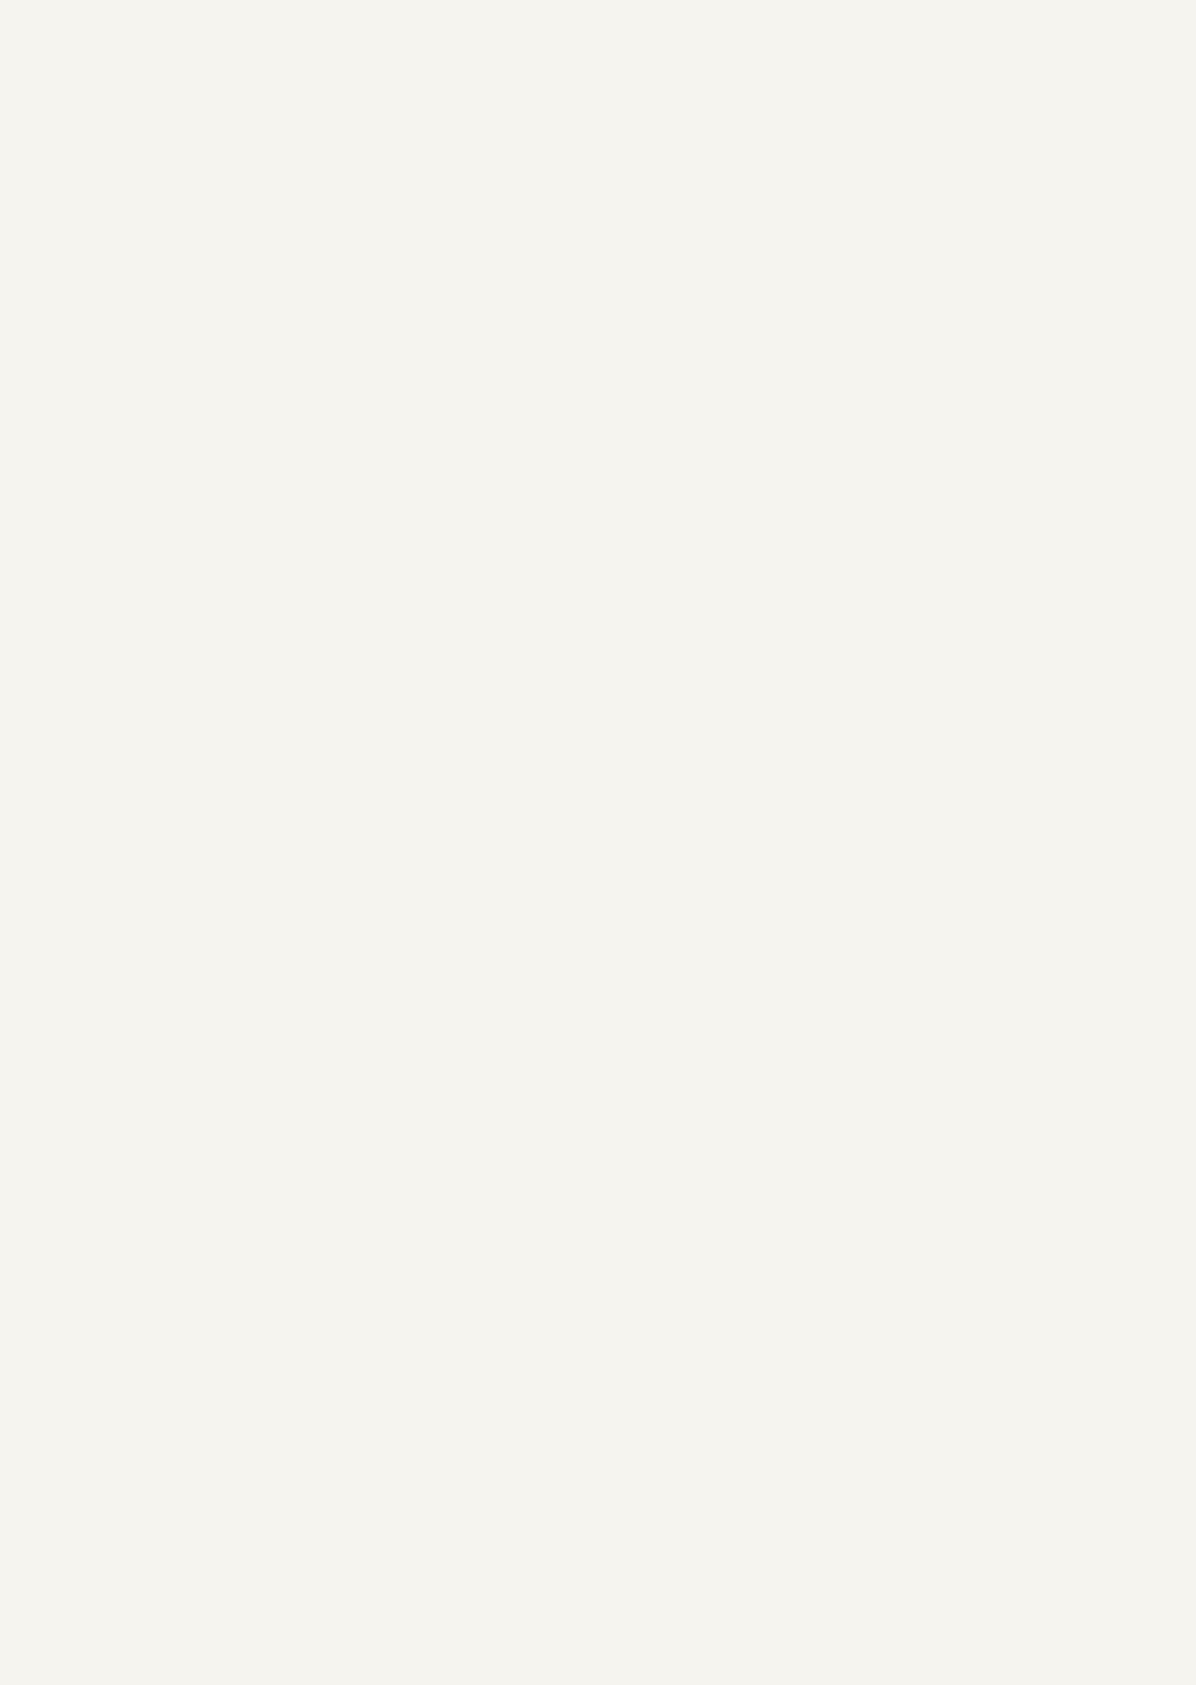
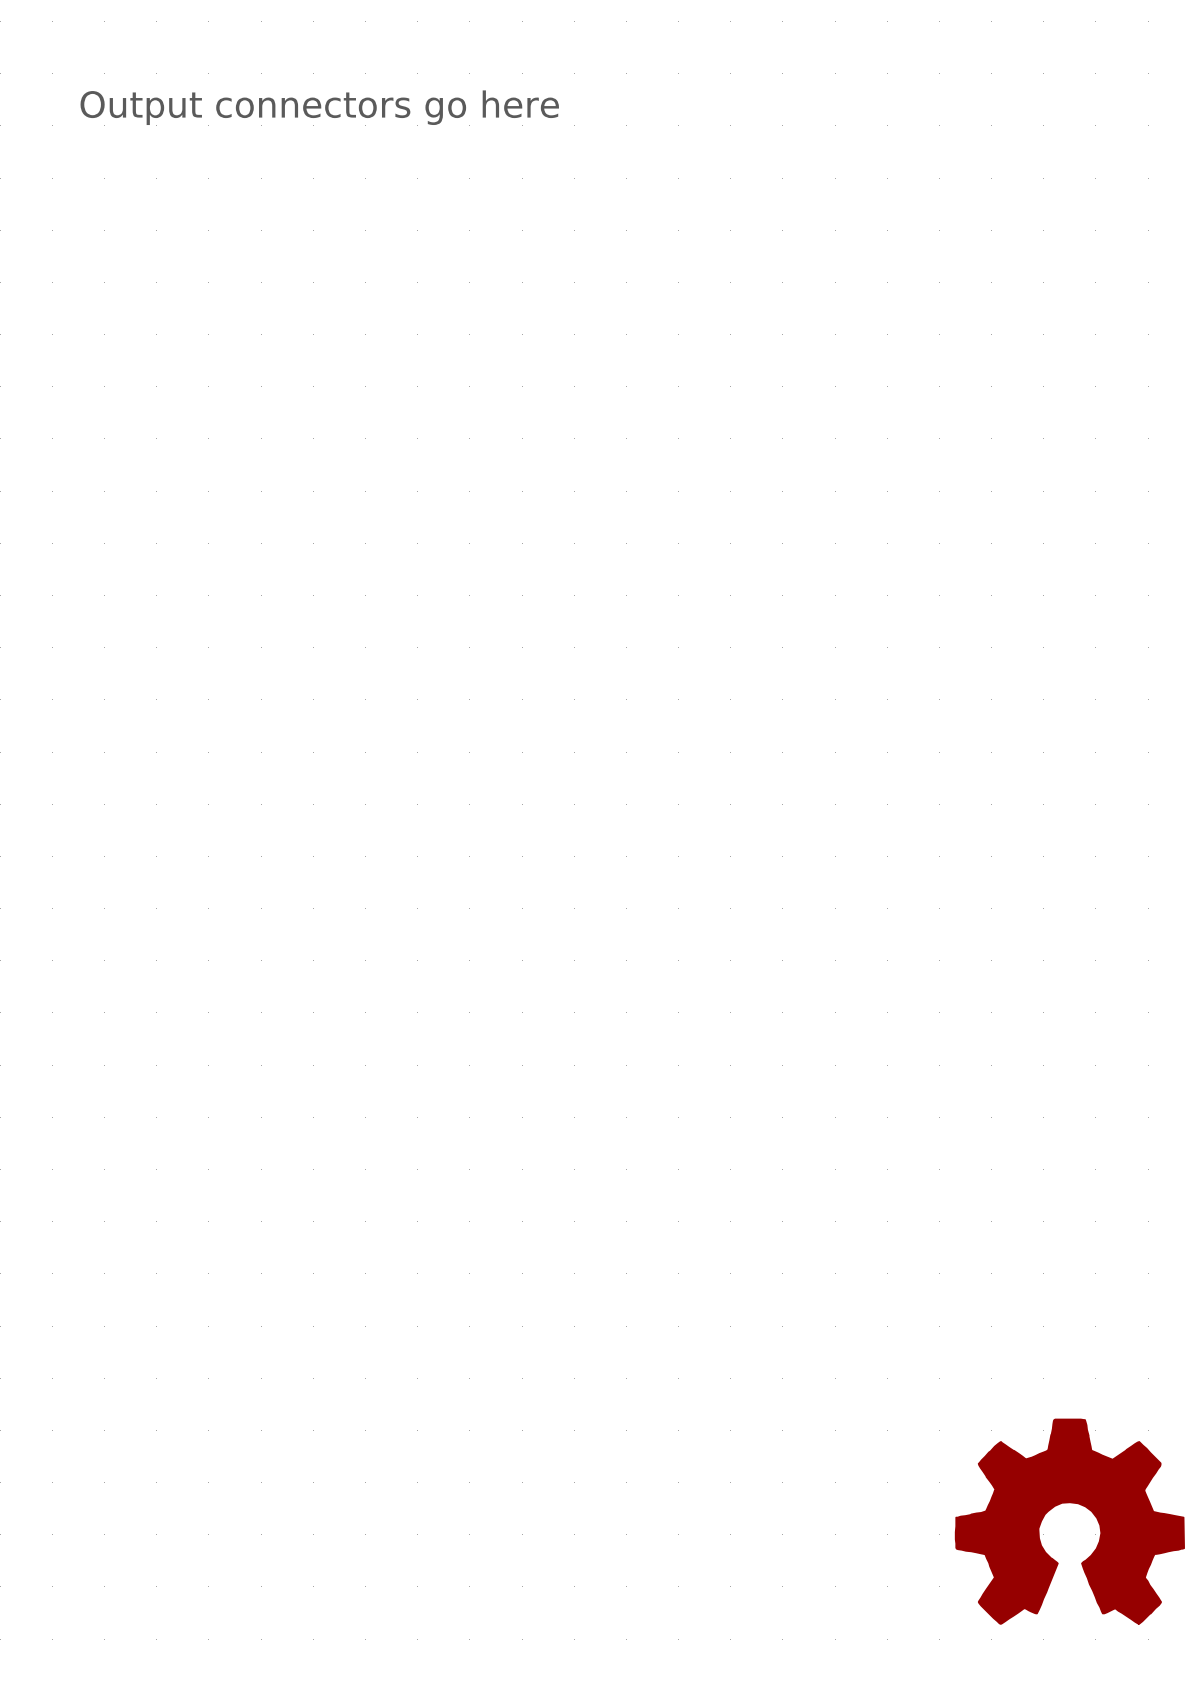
text: none -> Output connectors go here (319, 107)
part: none -> (1069, 1521)

